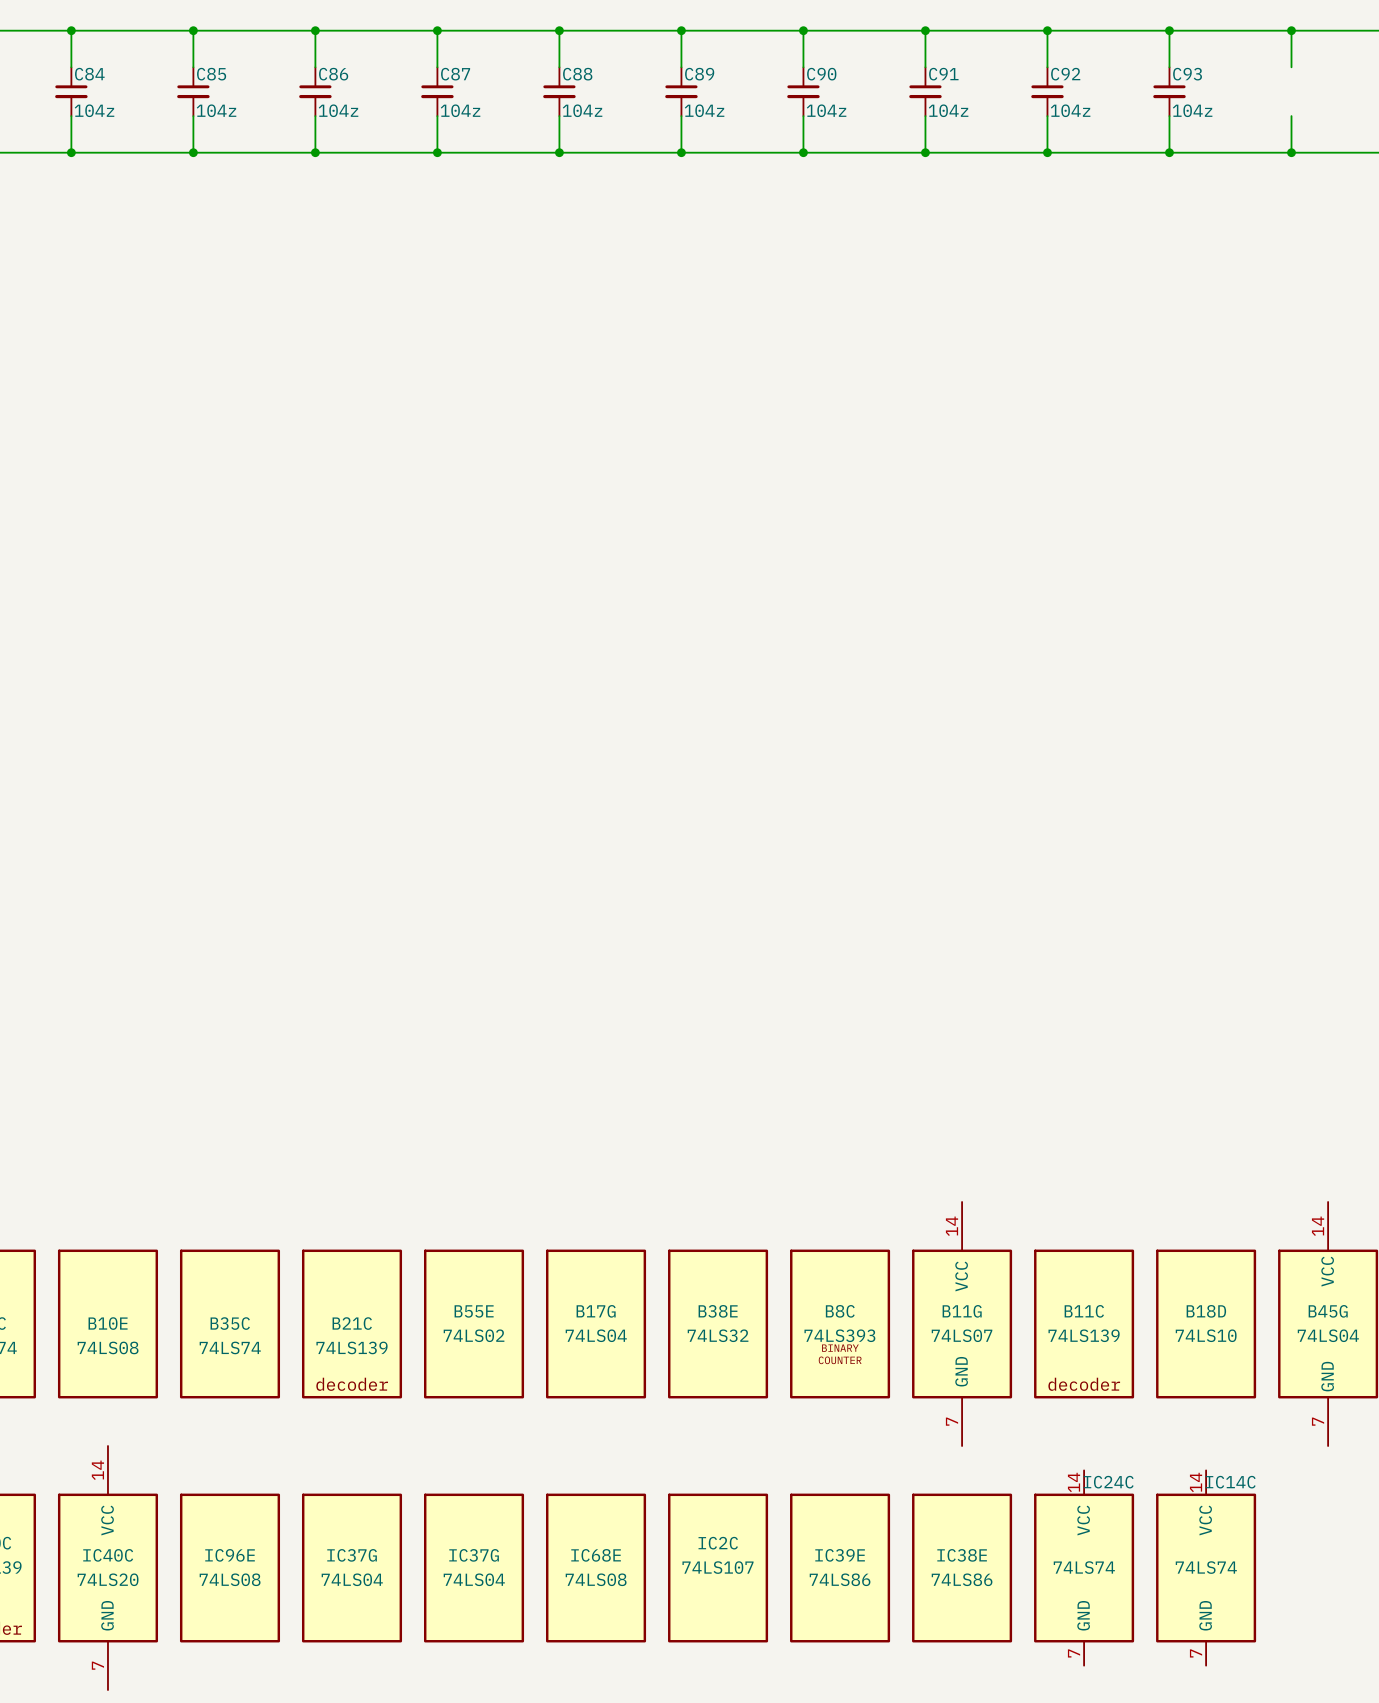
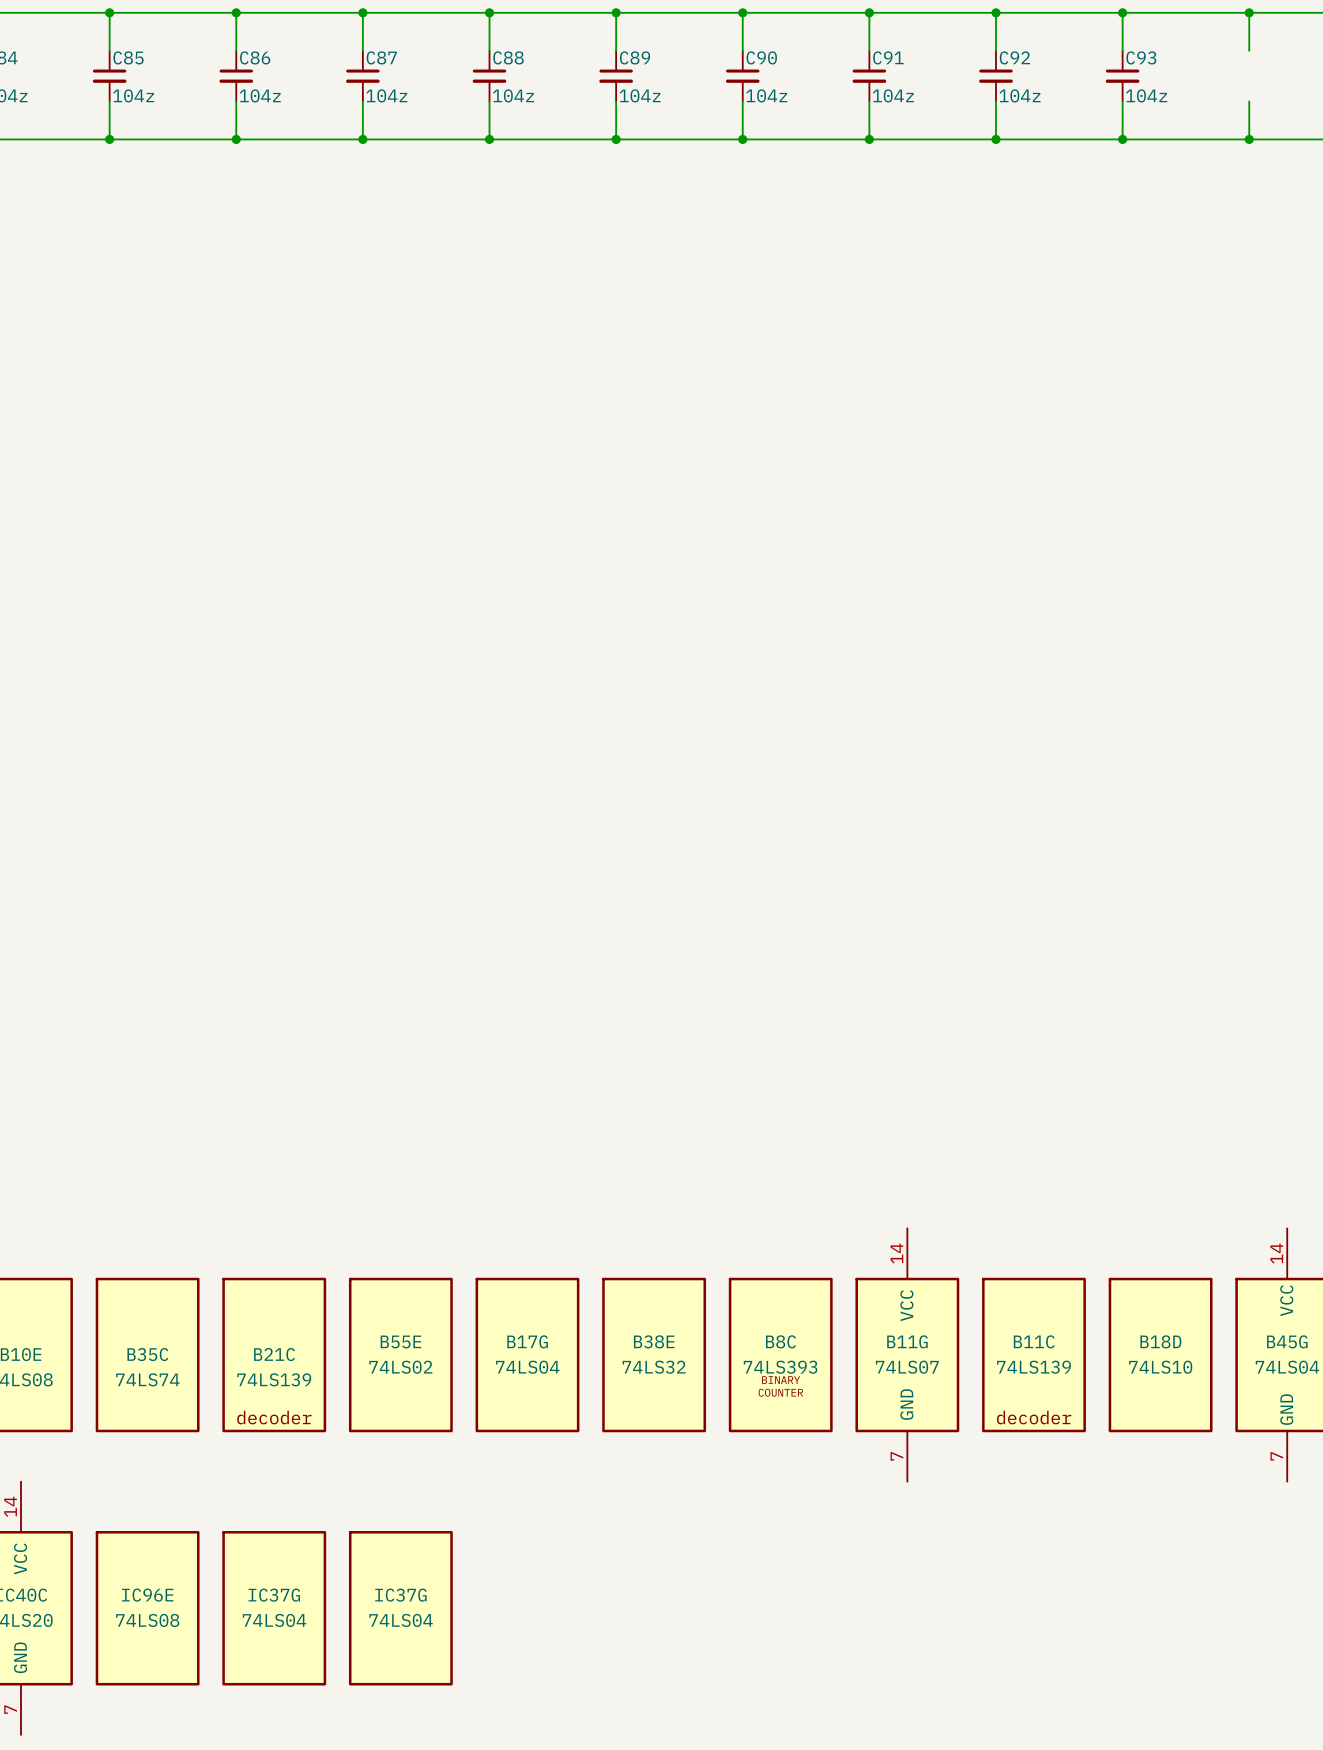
IC68E: 74LS08 (596, 1568) -> none
IC2C: 74LS107 (718, 1568) -> none
IC39E: 74LS86 (840, 1568) -> none
IC38E: 74LS86 (962, 1568) -> none
IC24C: 74LS74 (1084, 1568) -> none
IC14C: 74LS74 (1206, 1568) -> none

